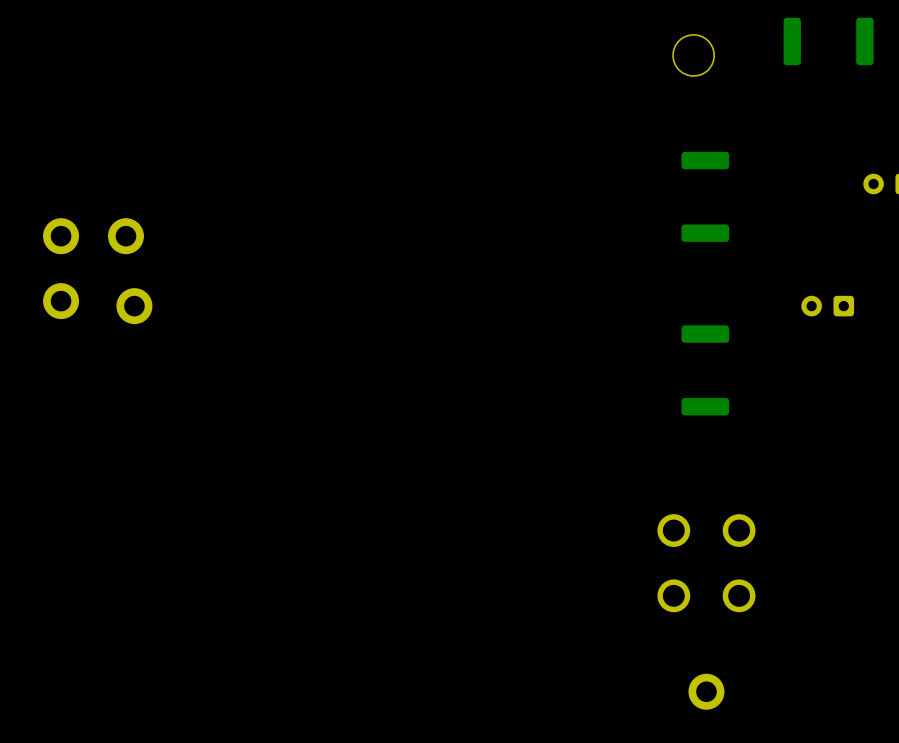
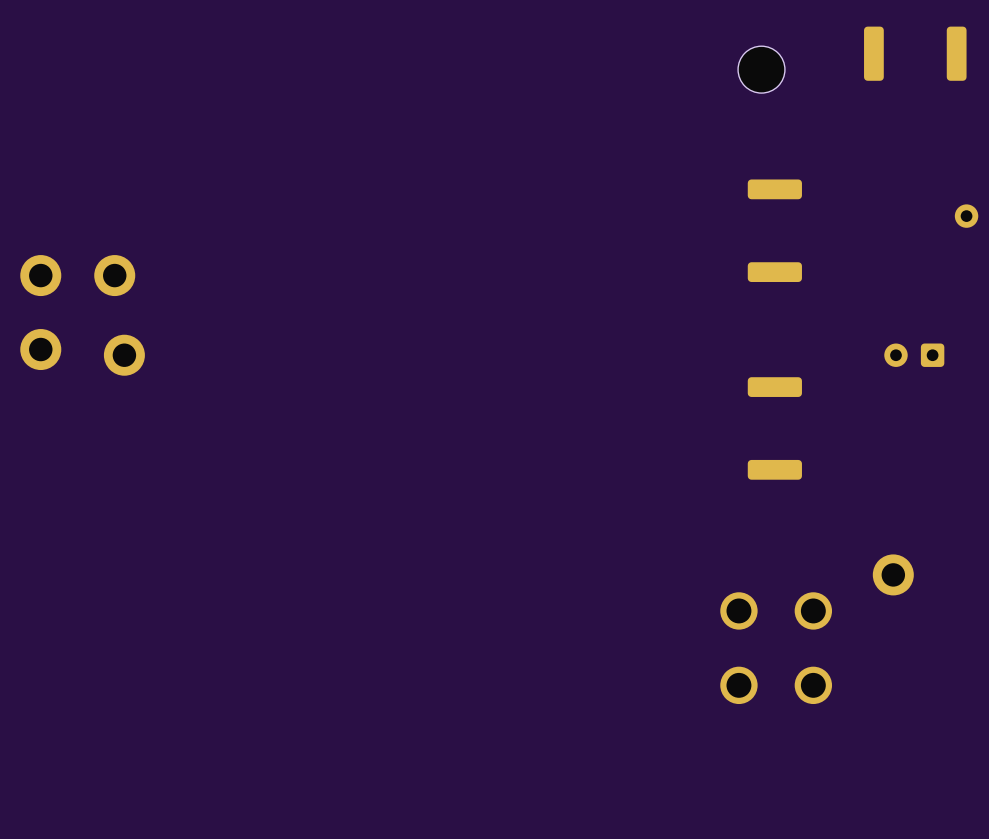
part position: (706, 691) -> (893, 574)

